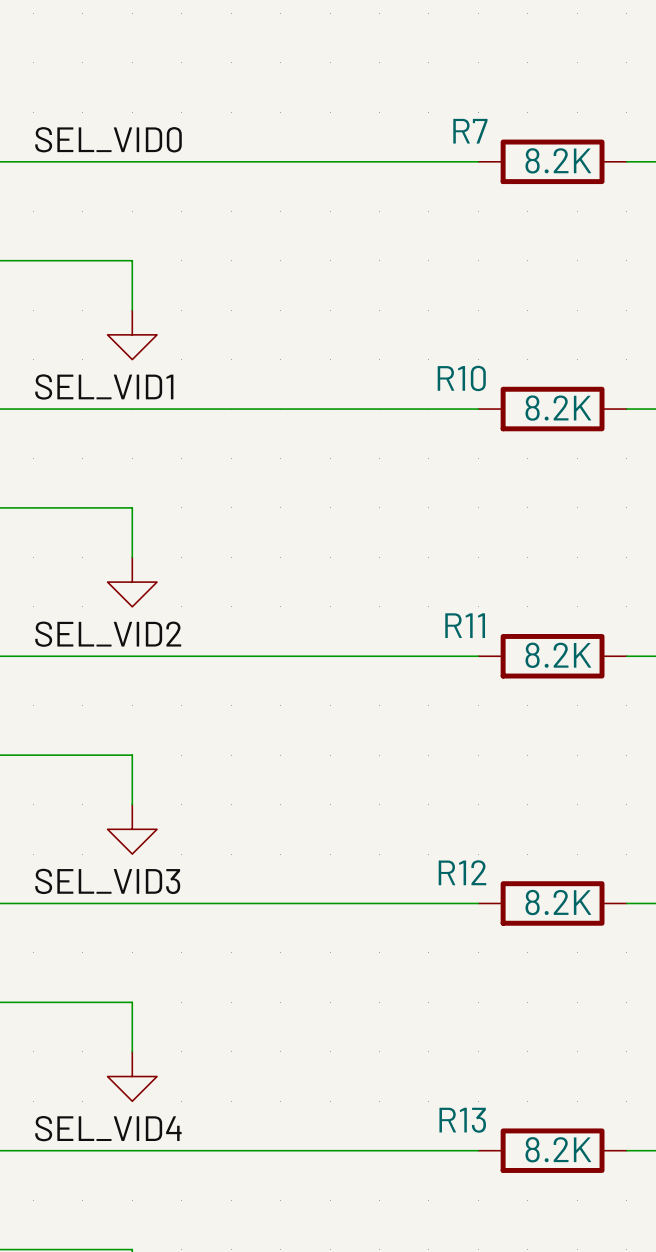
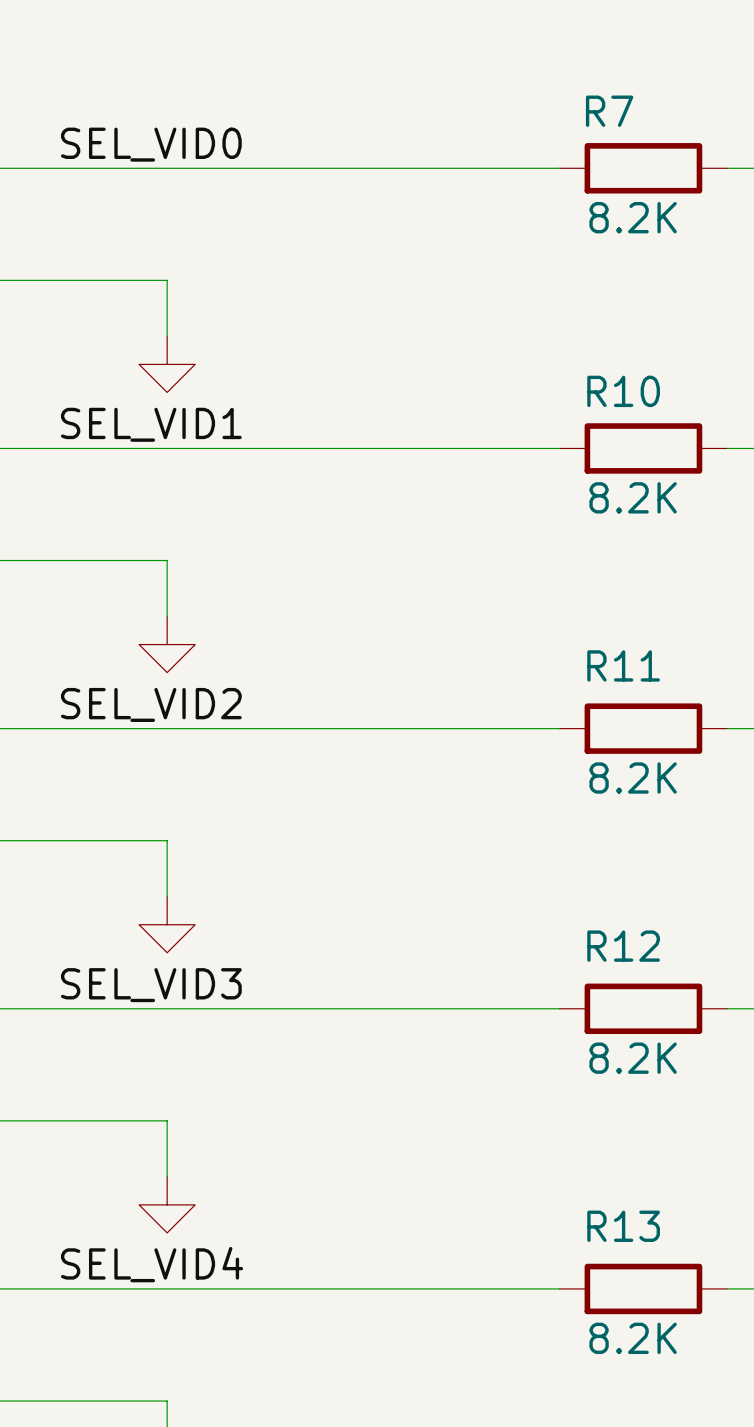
R7 name position: R7 (470, 131) -> R7 (609, 111)
R7 value position: 8.2K (558, 160) -> 8.2K (633, 217)
R10 name position: R10 (461, 378) -> R10 (623, 391)
R10 value position: 8.2K (558, 408) -> 8.2K (633, 497)
R11 name position: R11 (465, 625) -> R11 (623, 665)
R11 value position: 8.2K (558, 655) -> 8.2K (633, 778)
R12 name position: R12 (462, 872) -> R12 (623, 946)
R12 value position: 8.2K (558, 902) -> 8.2K (633, 1058)
R13 name position: R13 (462, 1120) -> R13 (623, 1226)
R13 value position: 8.2K (558, 1149) -> 8.2K (633, 1338)

